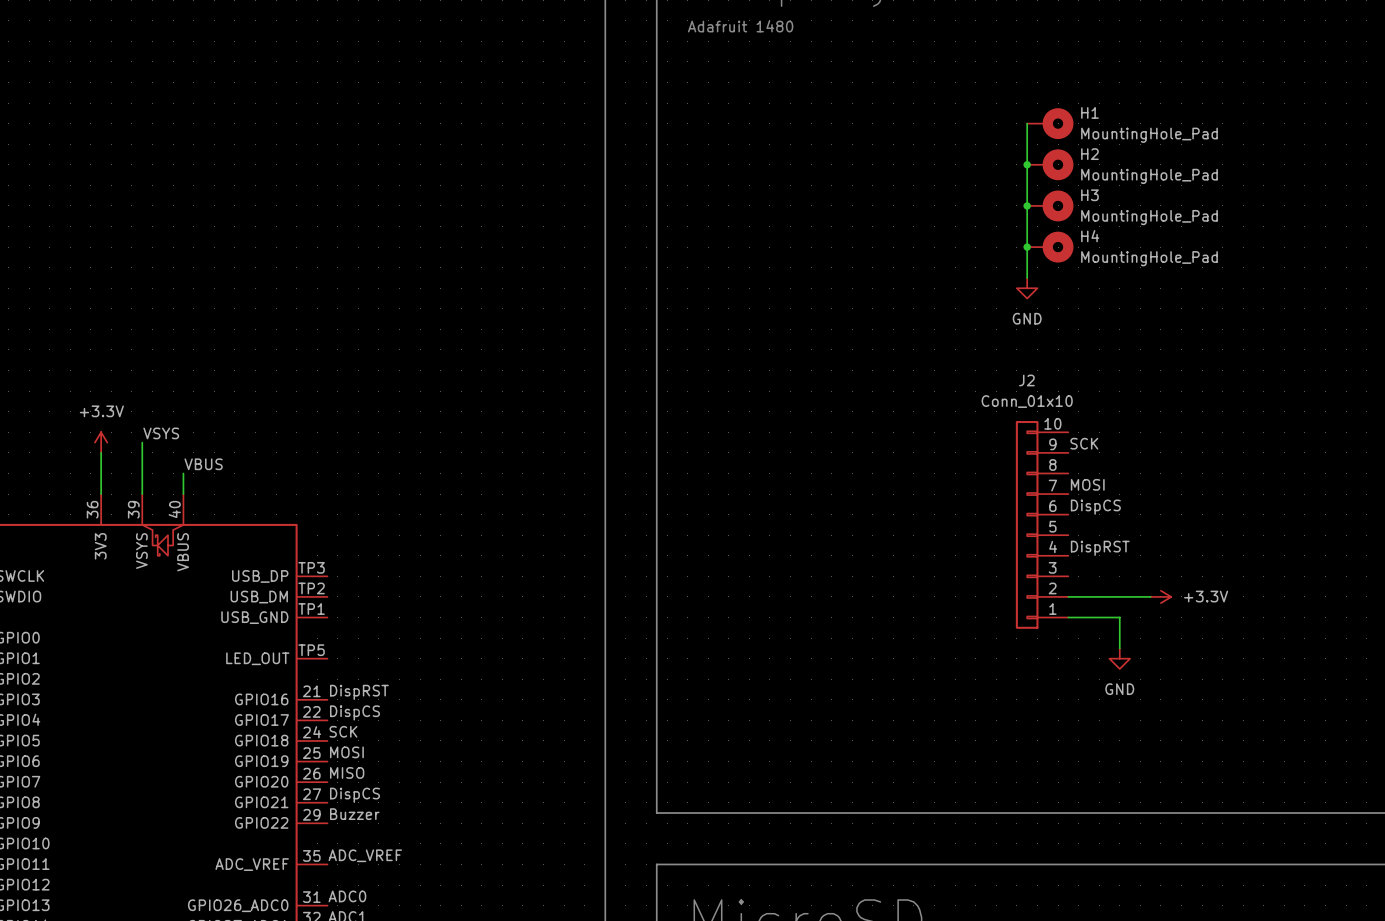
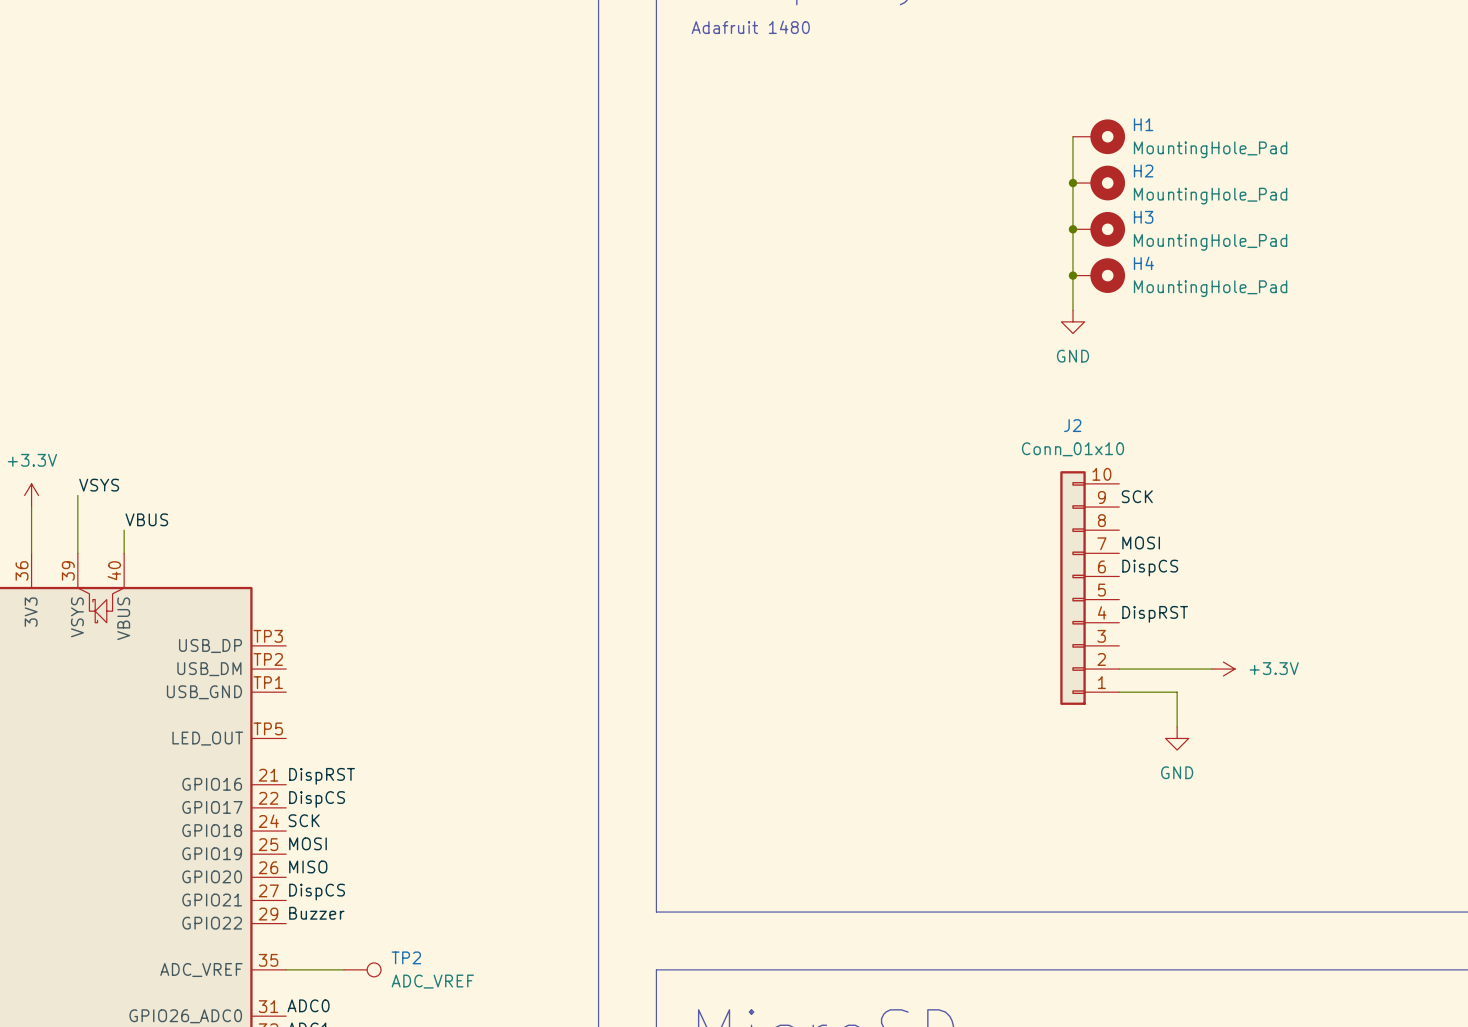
label: ADC_VREF (365, 855) -> none
wire: none -> (286, 969) (344, 969)
TP2: none -> ADC_VREF (362, 969)

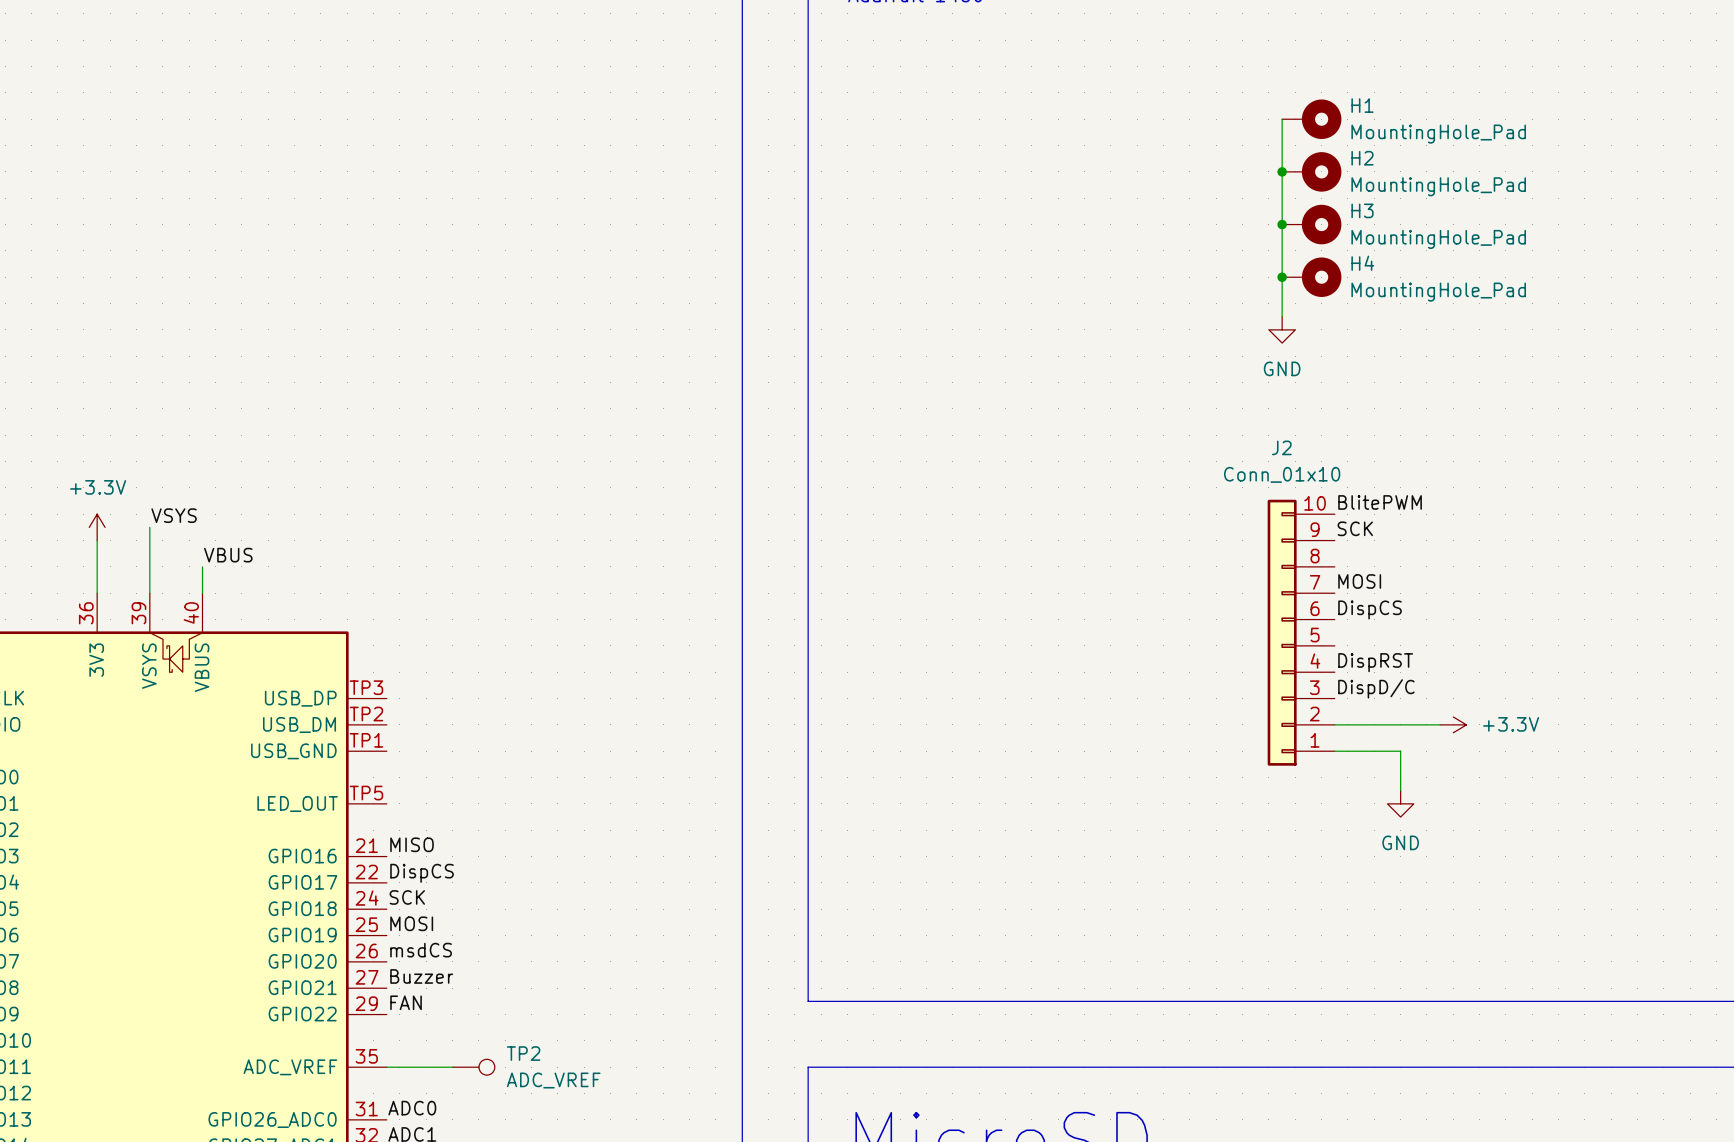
label: none -> BlitePWM (1380, 502)
label: none -> DispD/C (1376, 688)
label: DispRST (322, 776) -> MISO (412, 844)
label: MISO (308, 866) -> msdCS (421, 950)
label: DispCS (317, 892) -> Buzzer (421, 976)
label: Buzzer (316, 913) -> FAN (406, 1002)

